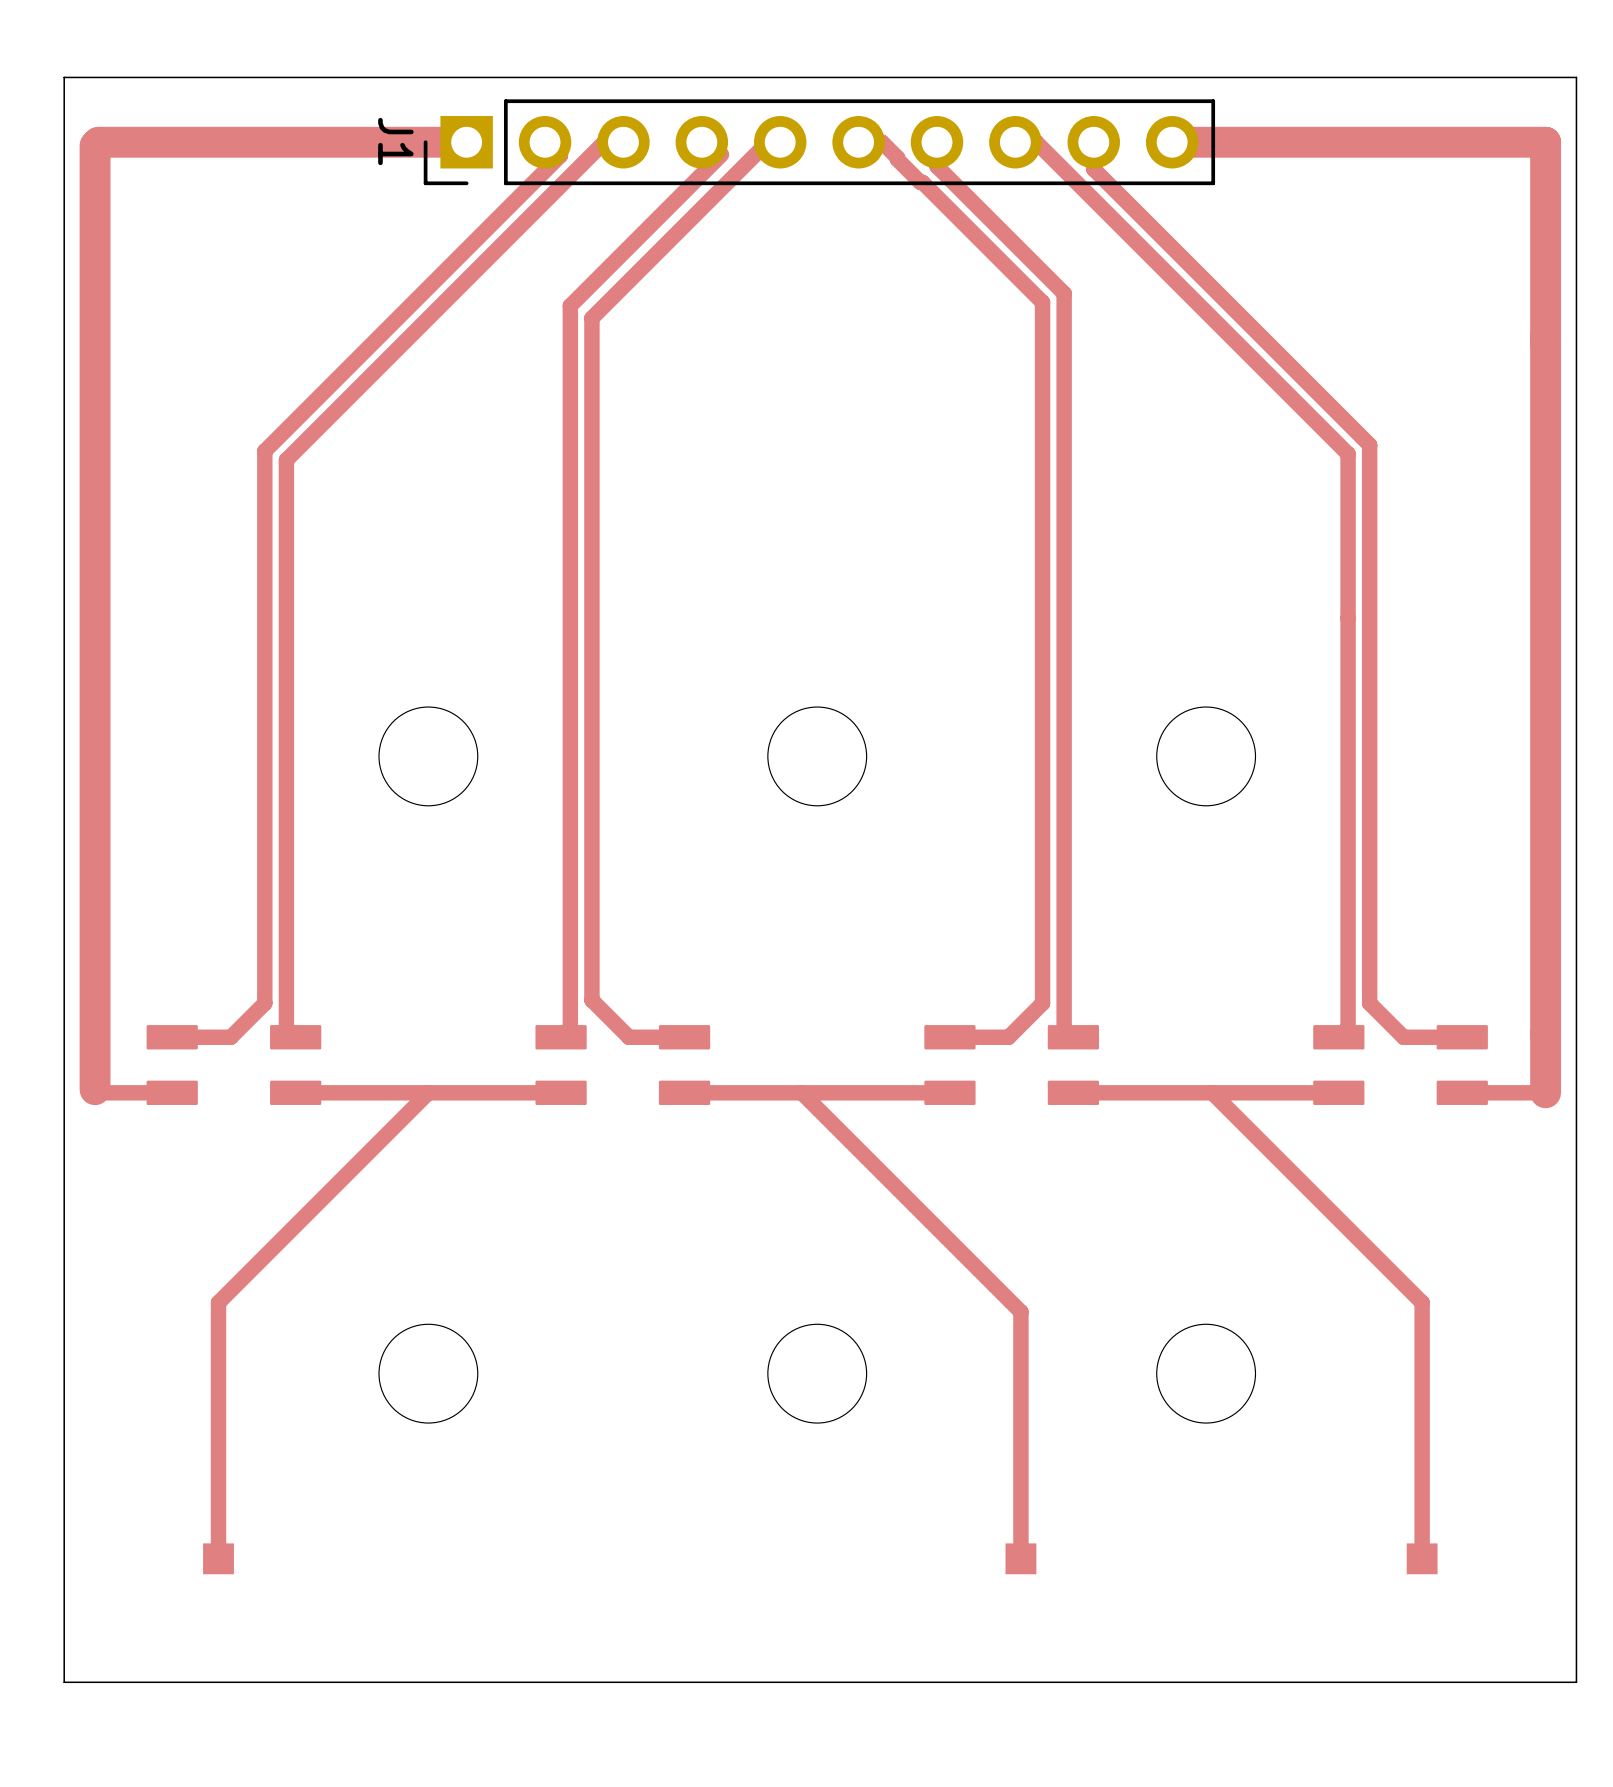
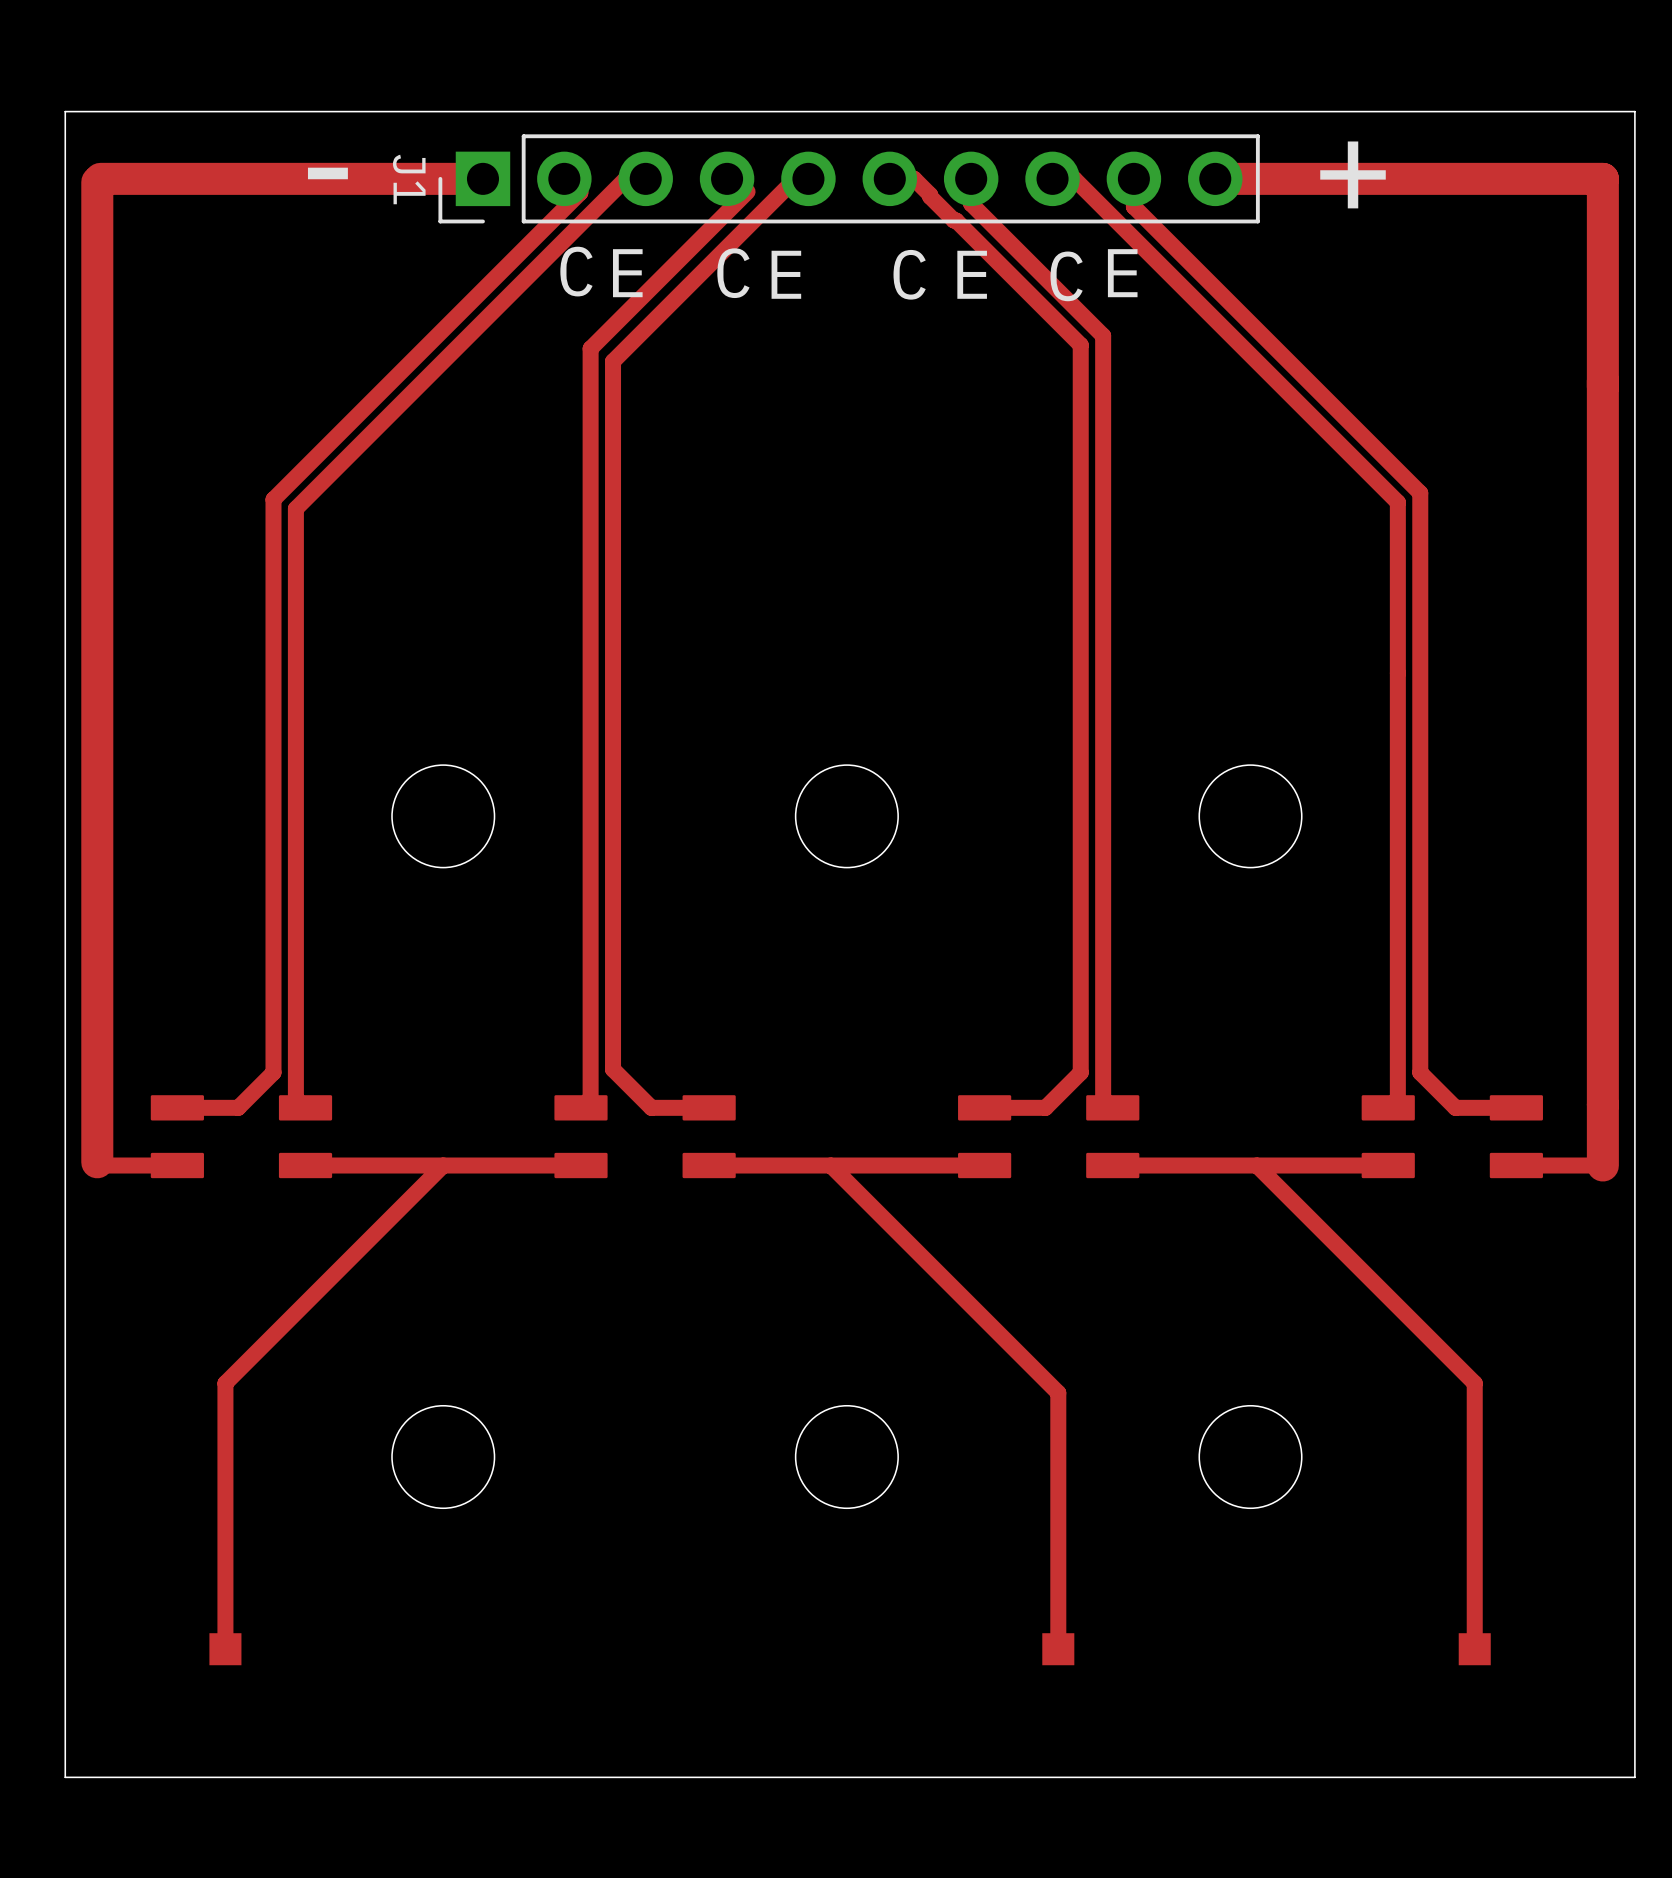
text: none -> - (327, 173)
text: none -> + (1353, 174)
text: none -> C (576, 271)
text: none -> E (627, 273)
text: none -> C (733, 273)
text: none -> E (1122, 273)
text: none -> E (786, 274)
text: none -> C (909, 274)
text: none -> E (972, 274)
text: none -> C (1066, 276)

